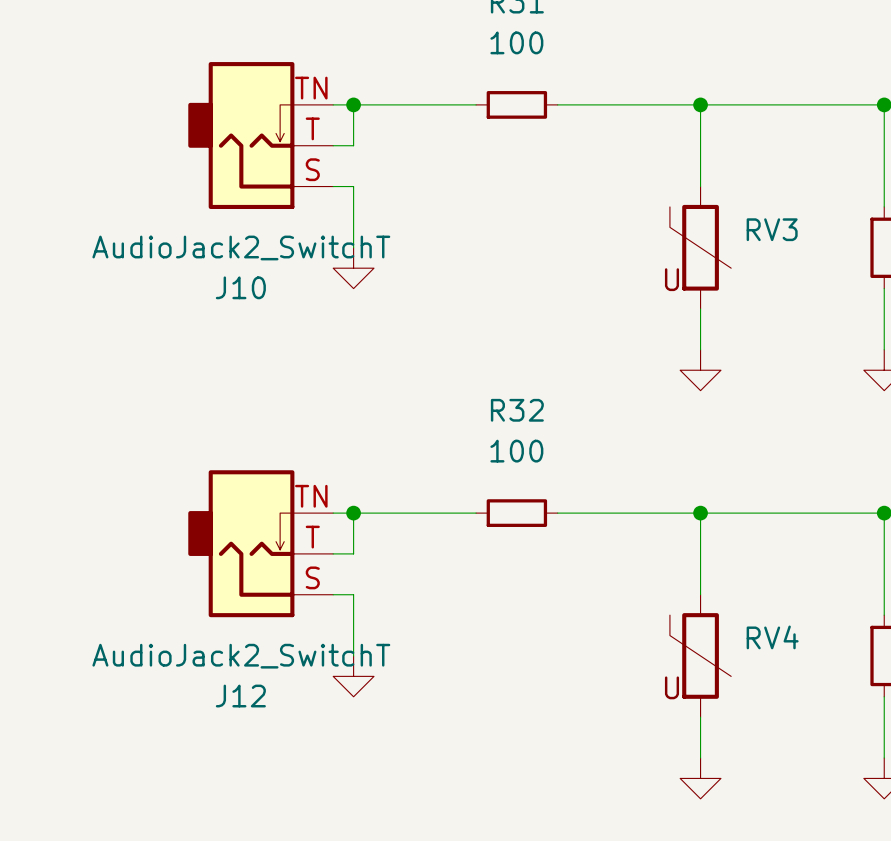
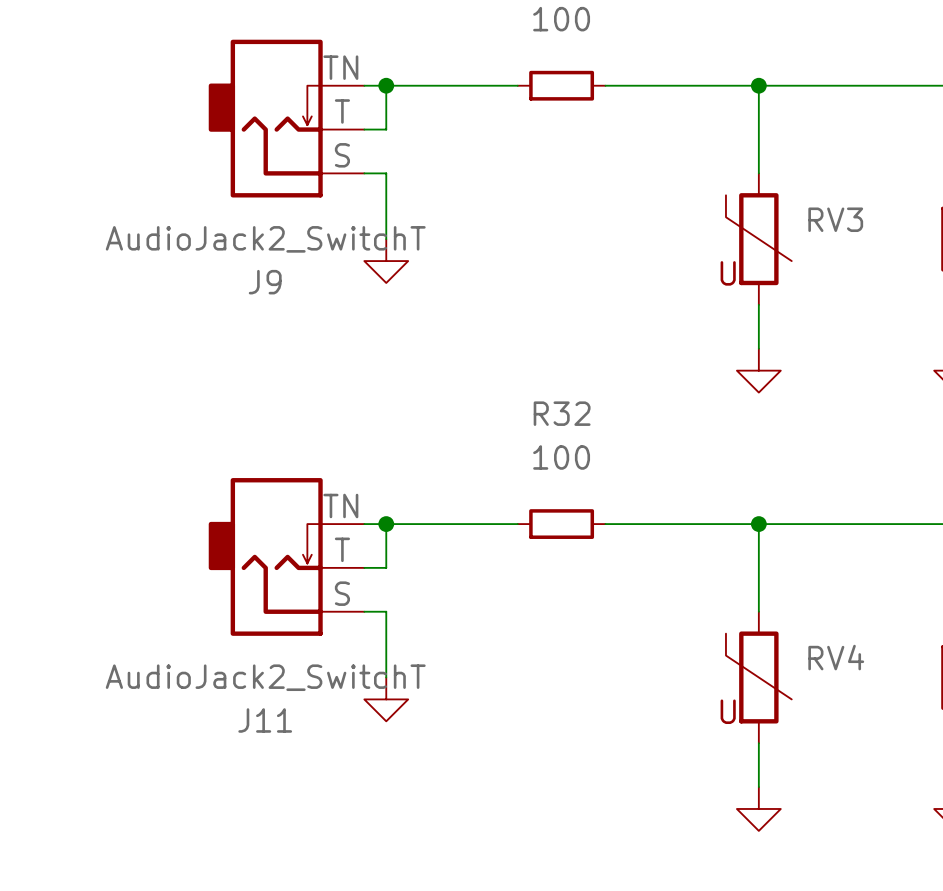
J10 name: J10 (240, 287) -> J9 (265, 282)
J12 name: J12 (240, 696) -> J11 (265, 720)

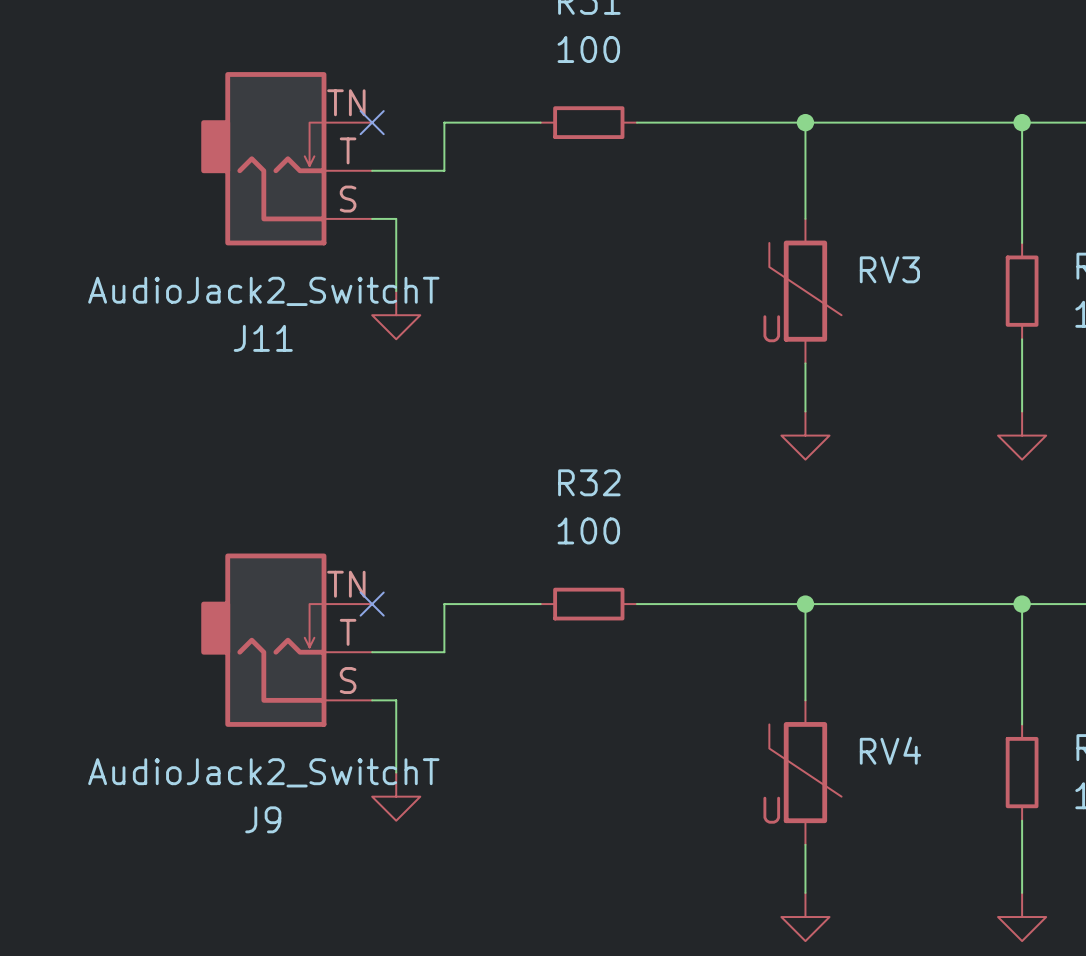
wire: (364, 85) (430, 85) -> none
no-connect mark: none -> (372, 122)
wire: (386, 85) (386, 129) -> (444, 122) (444, 170) (396, 170)
junction: (386, 85) -> none
J9 name: J9 (265, 282) -> J11 (263, 338)
wire: (364, 524) (430, 524) -> none
no-connect mark: none -> (372, 604)
wire: (386, 524) (386, 567) -> (444, 604) (444, 652) (396, 652)
junction: (386, 524) -> none
J11 name: J11 (265, 720) -> J9 (263, 819)

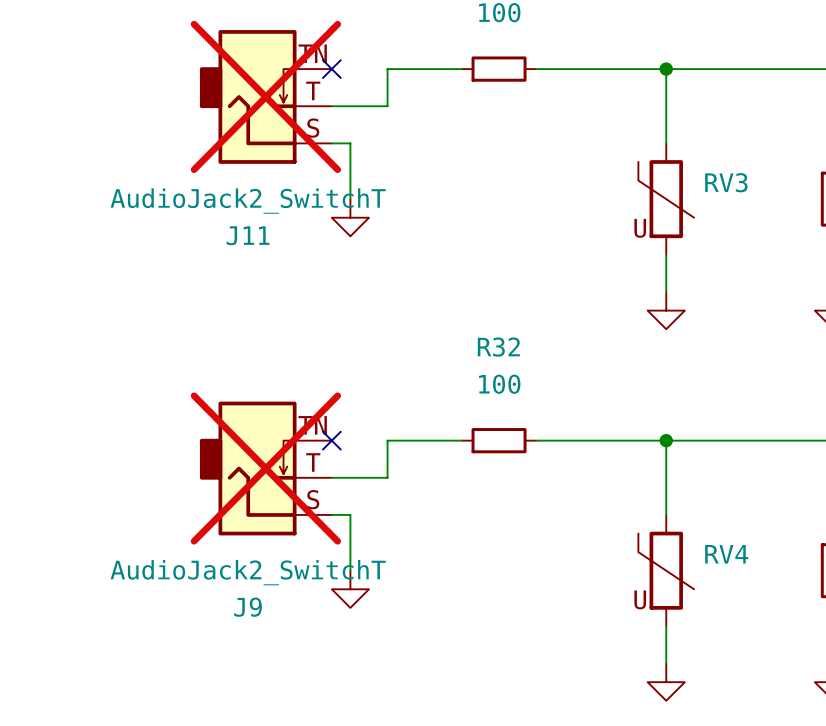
J11 do-not-place cross: none -> (265, 96)
J9 do-not-place cross: none -> (265, 468)

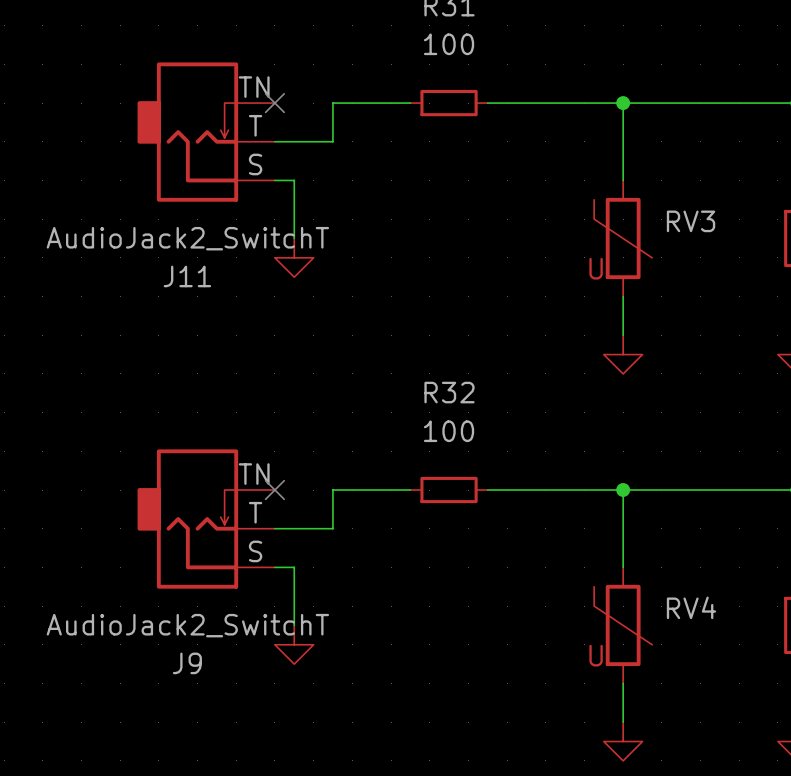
J11 do-not-place cross: (265, 96) -> none
J9 do-not-place cross: (265, 468) -> none

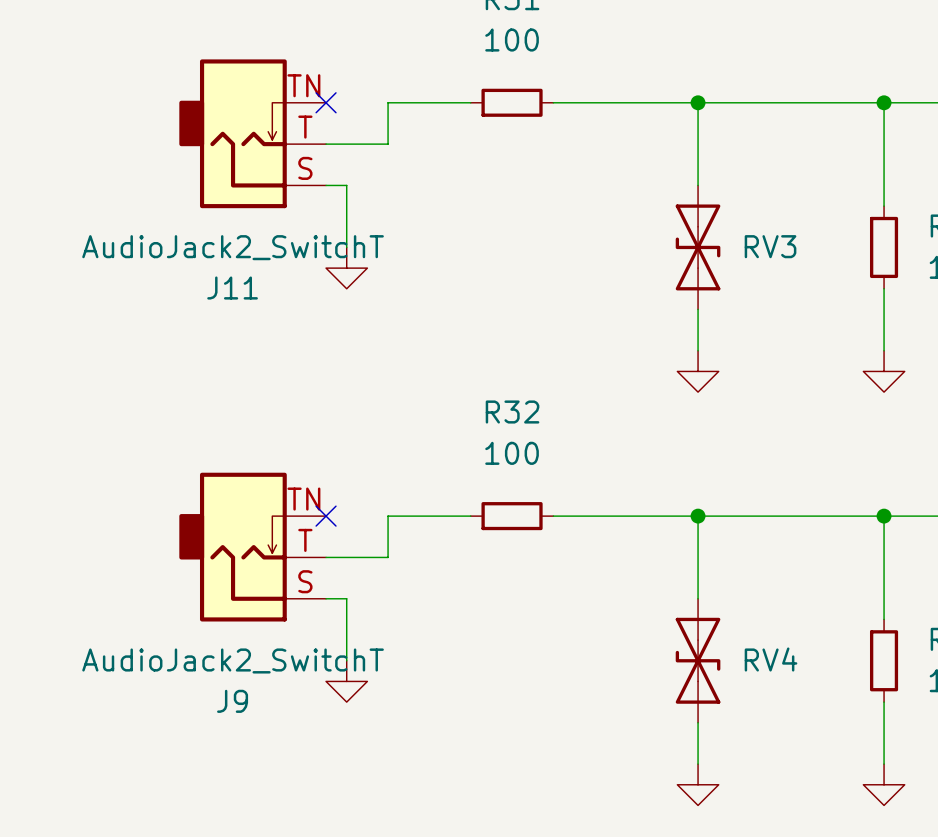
RV3 symbol: [594, 180, 653, 297] -> [675, 185, 721, 310]
RV4 symbol: [594, 567, 653, 684] -> [675, 598, 721, 723]

